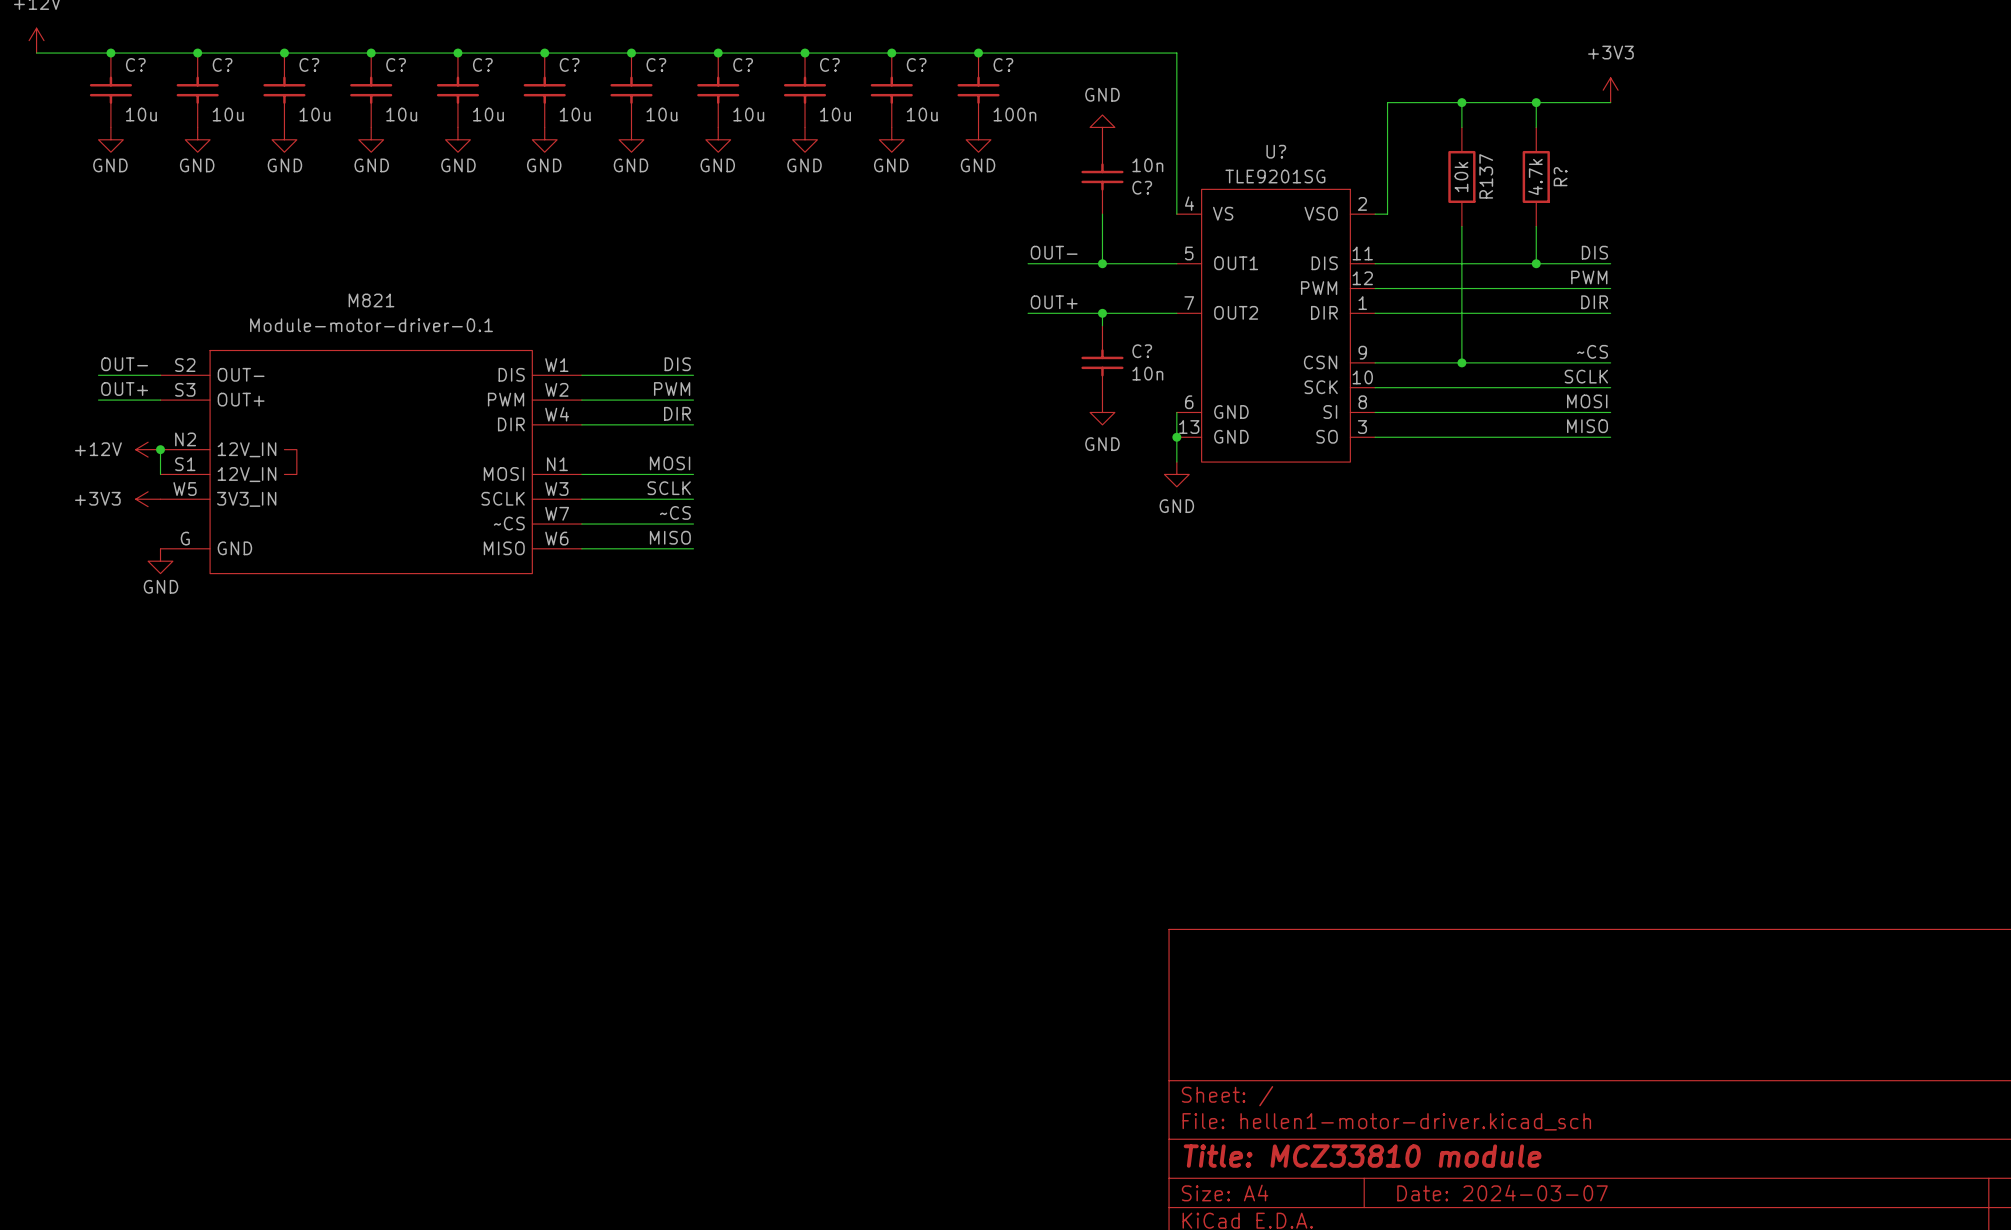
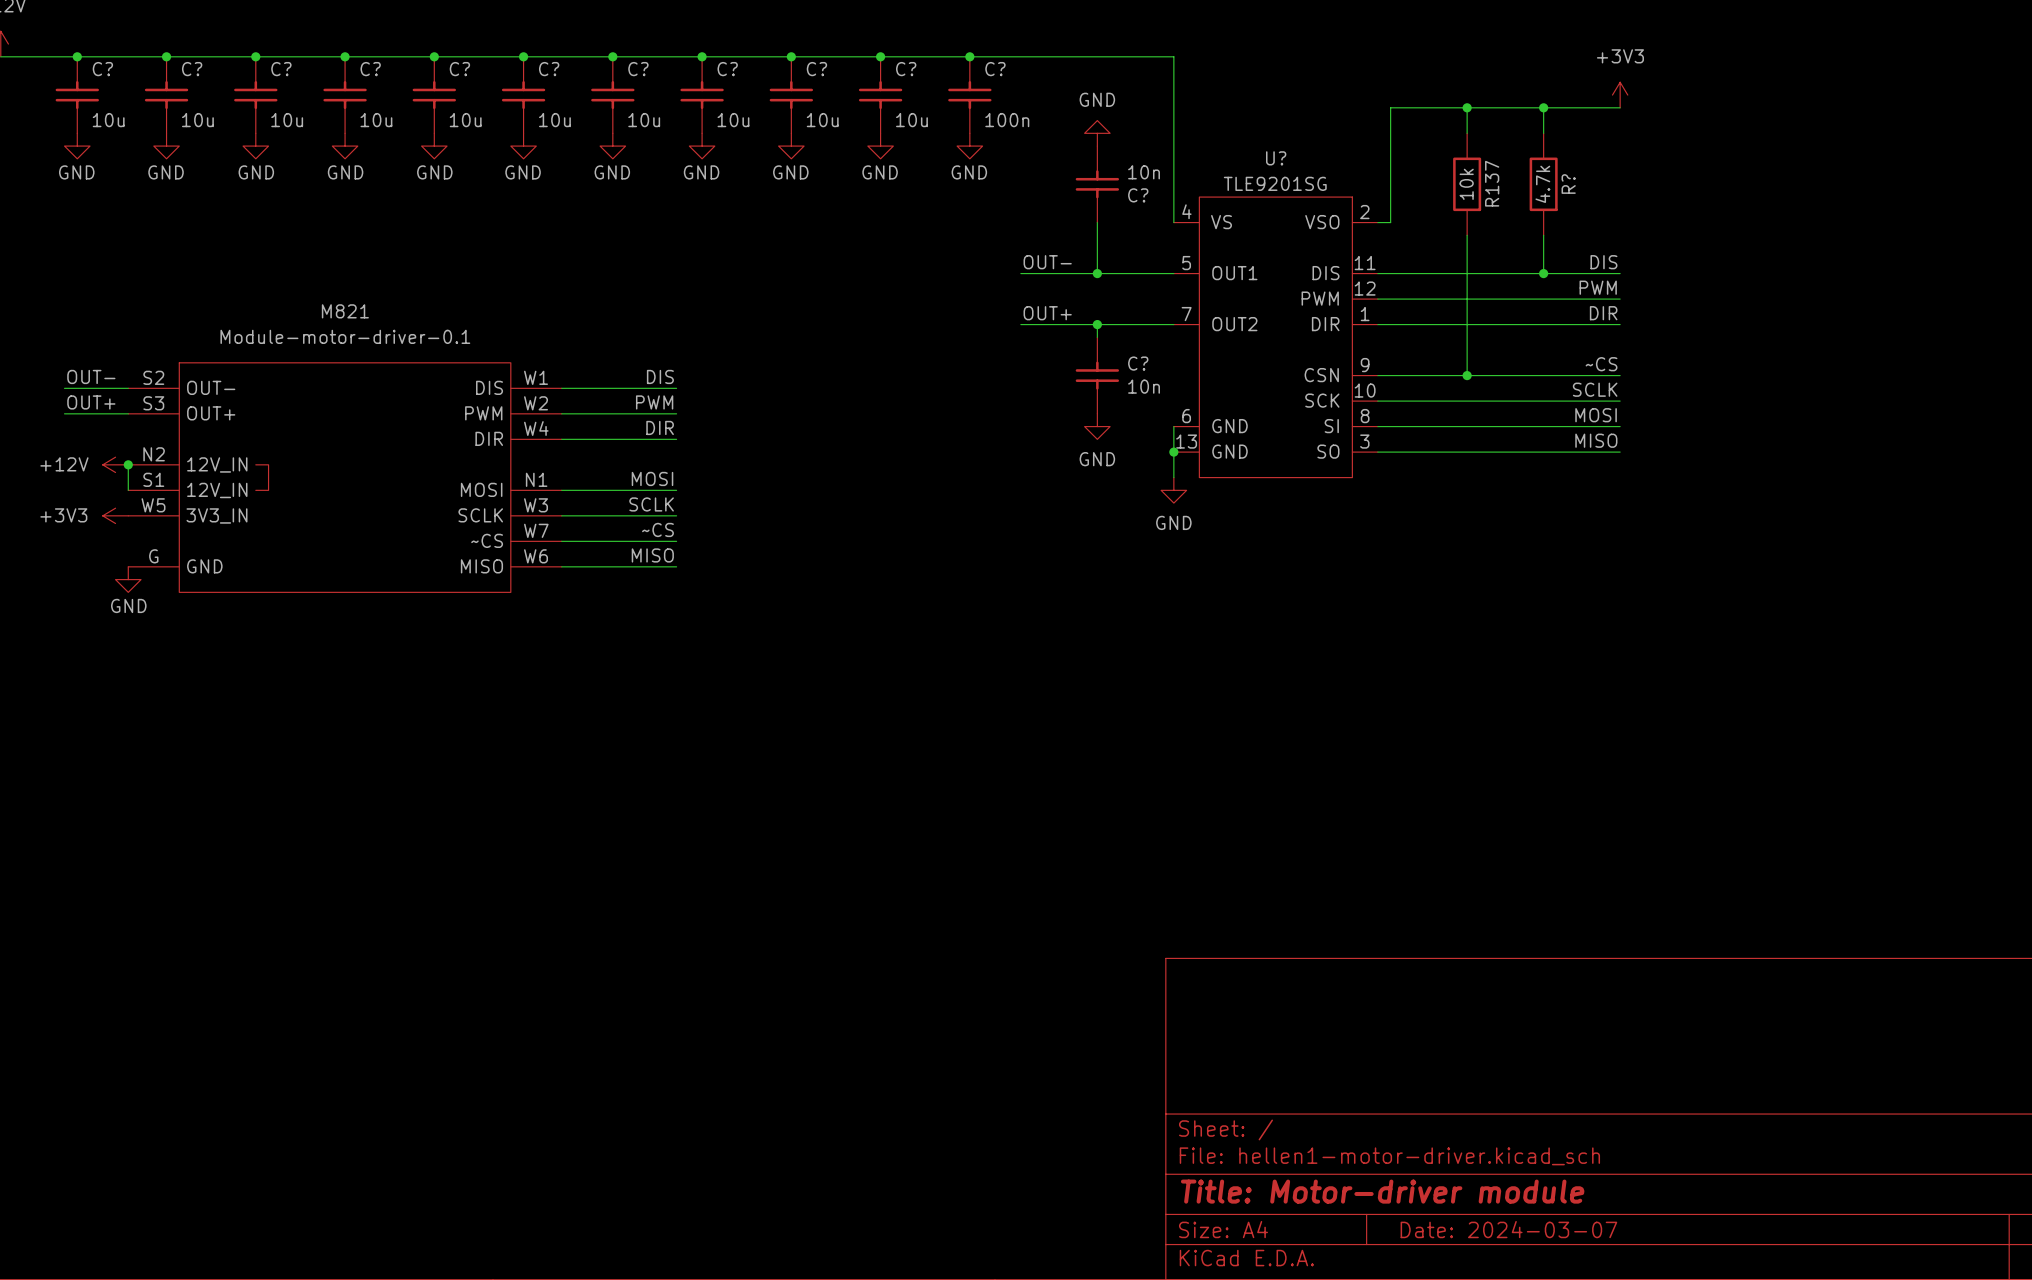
title block: Title: MCZ33810 module (1362, 1156) -> Title: Motor-driver module (1382, 1191)

